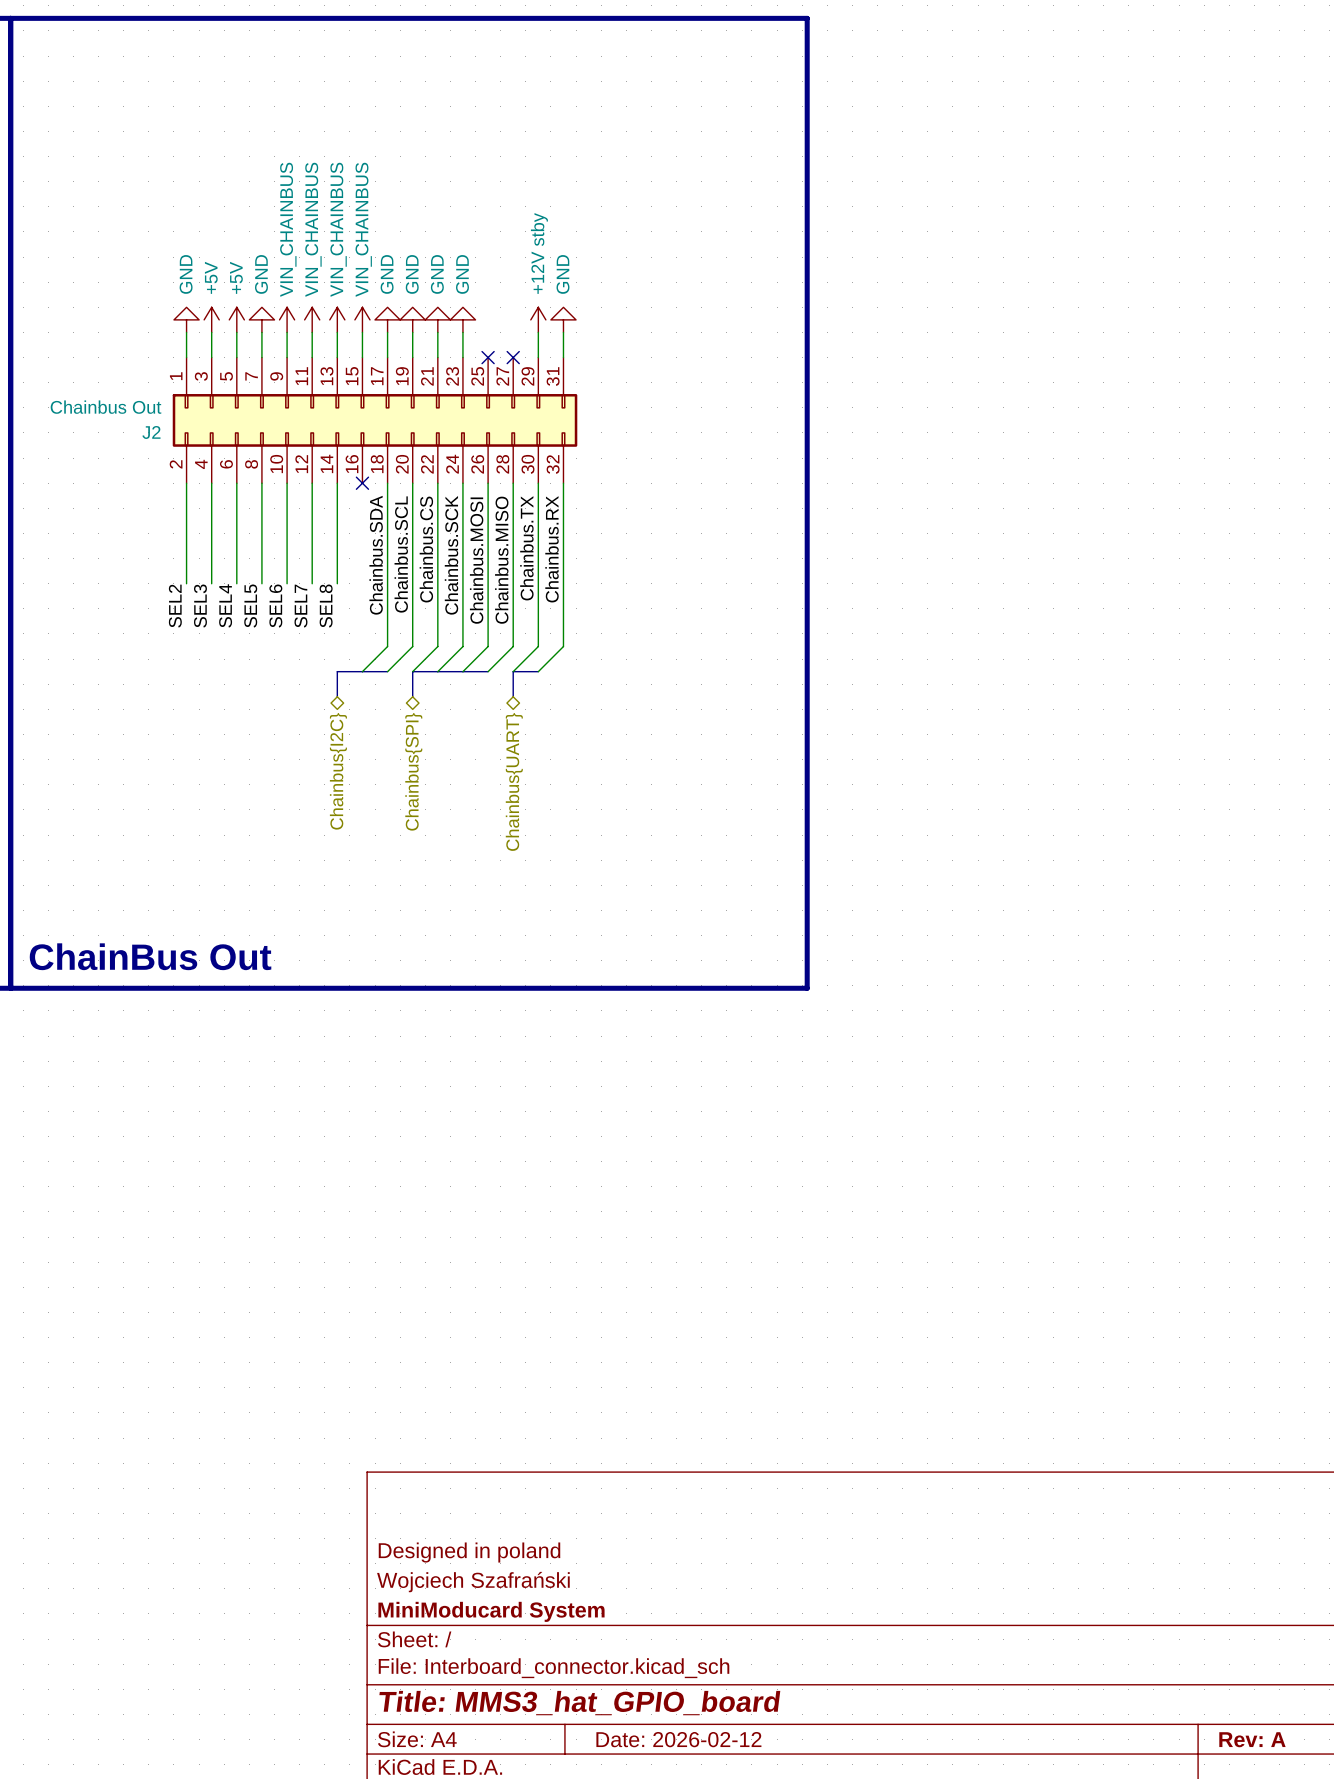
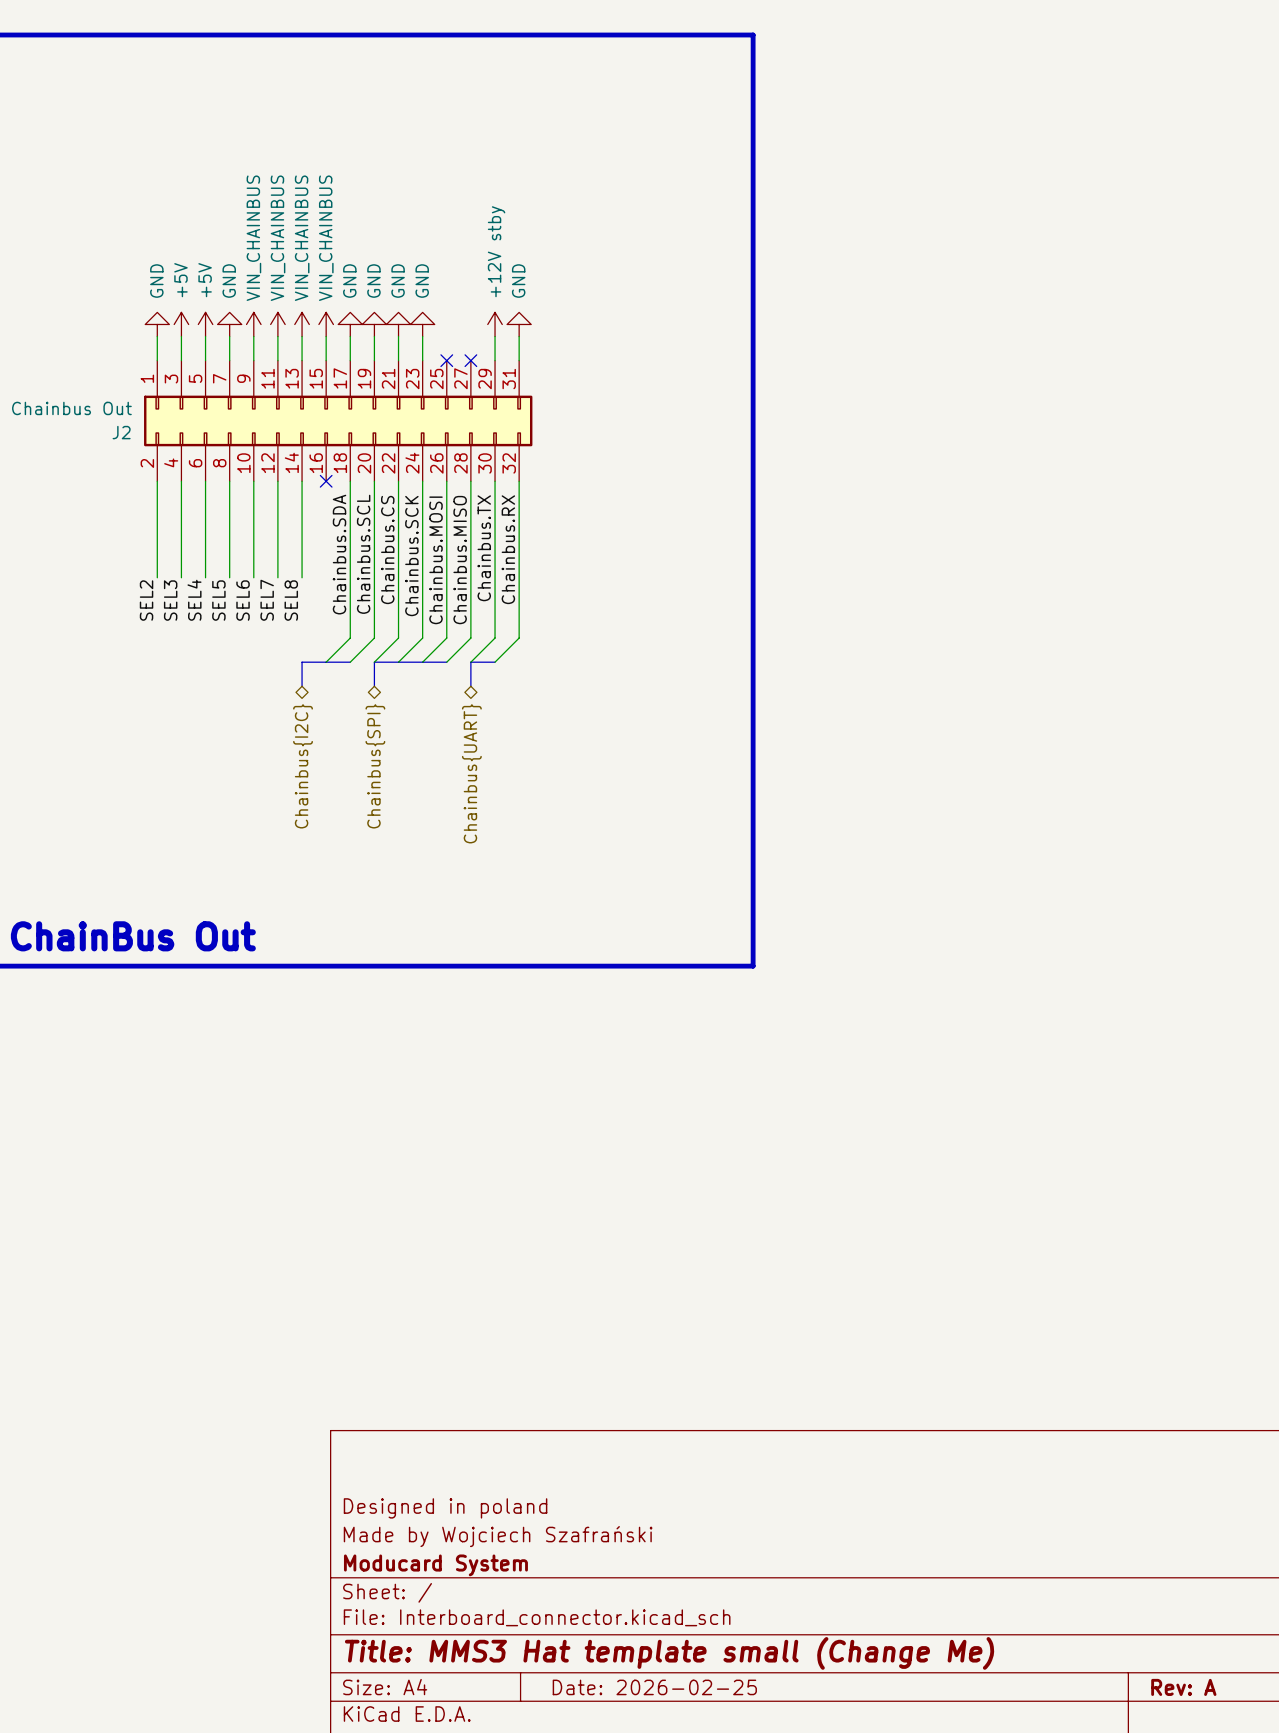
title block: Wojciech Szafrański (473, 1582) -> Made by Wojciech Szafrański (498, 1536)
title block: MiniModucard System (491, 1611) -> Moducard System (435, 1565)
title block: Title: MMS3_hat_GPIO_board (579, 1703) -> Title: MMS3 Hat template small (Change Me) (669, 1653)
title block: Date: 2026-02-12 (678, 1739) -> Date: 2026-02-25 (654, 1687)

